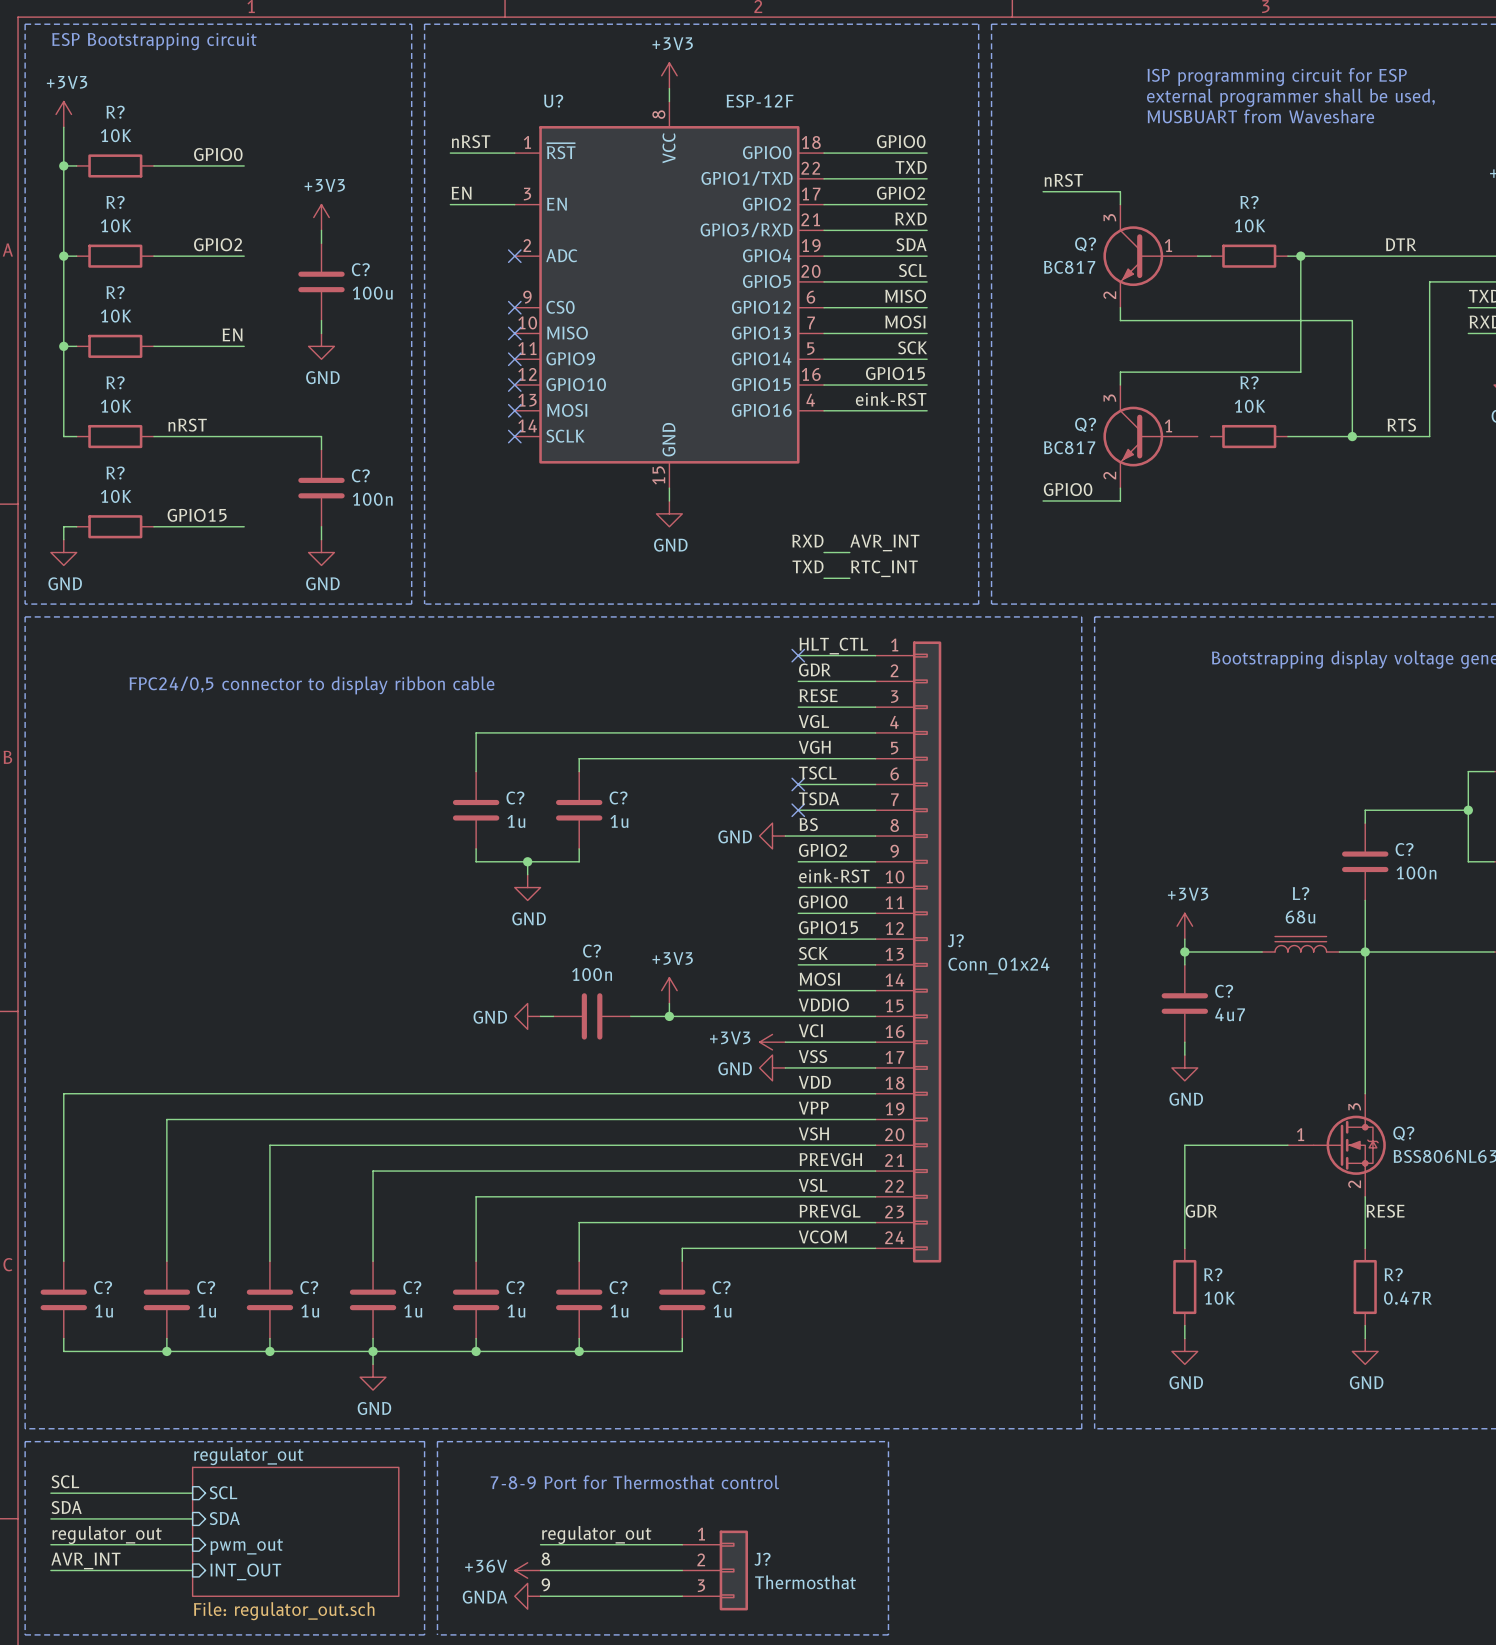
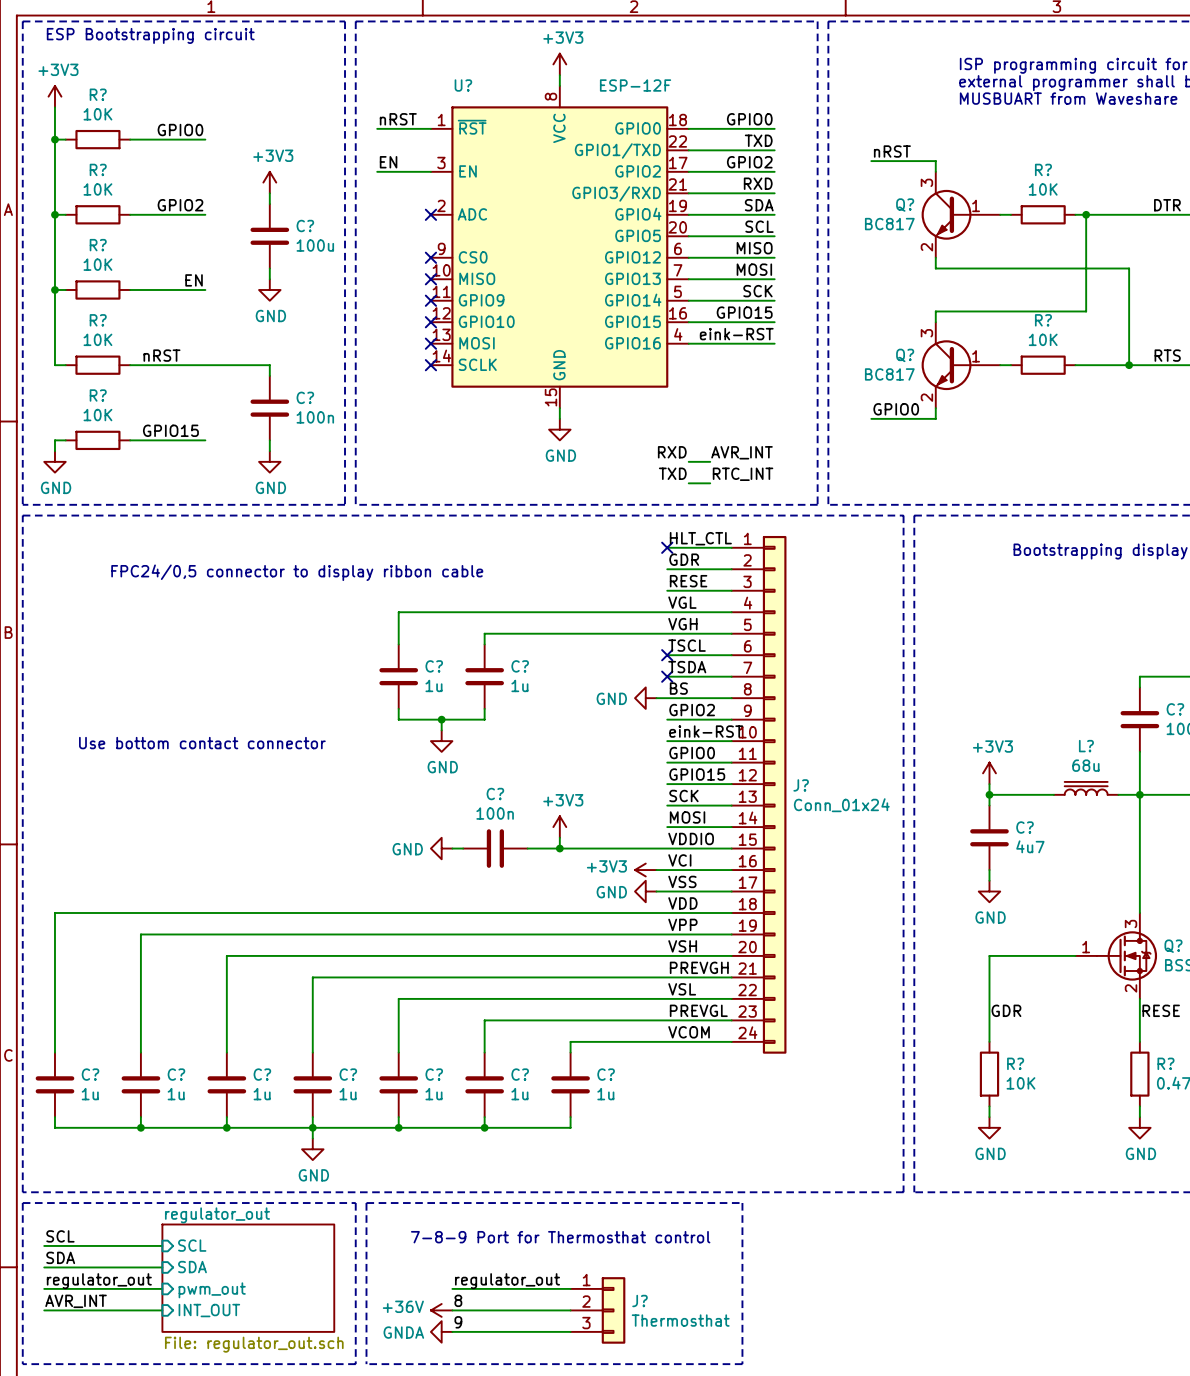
wire: none -> (1000, 365) (1010, 365)
text: none -> Use bottom contact connector (202, 743)

